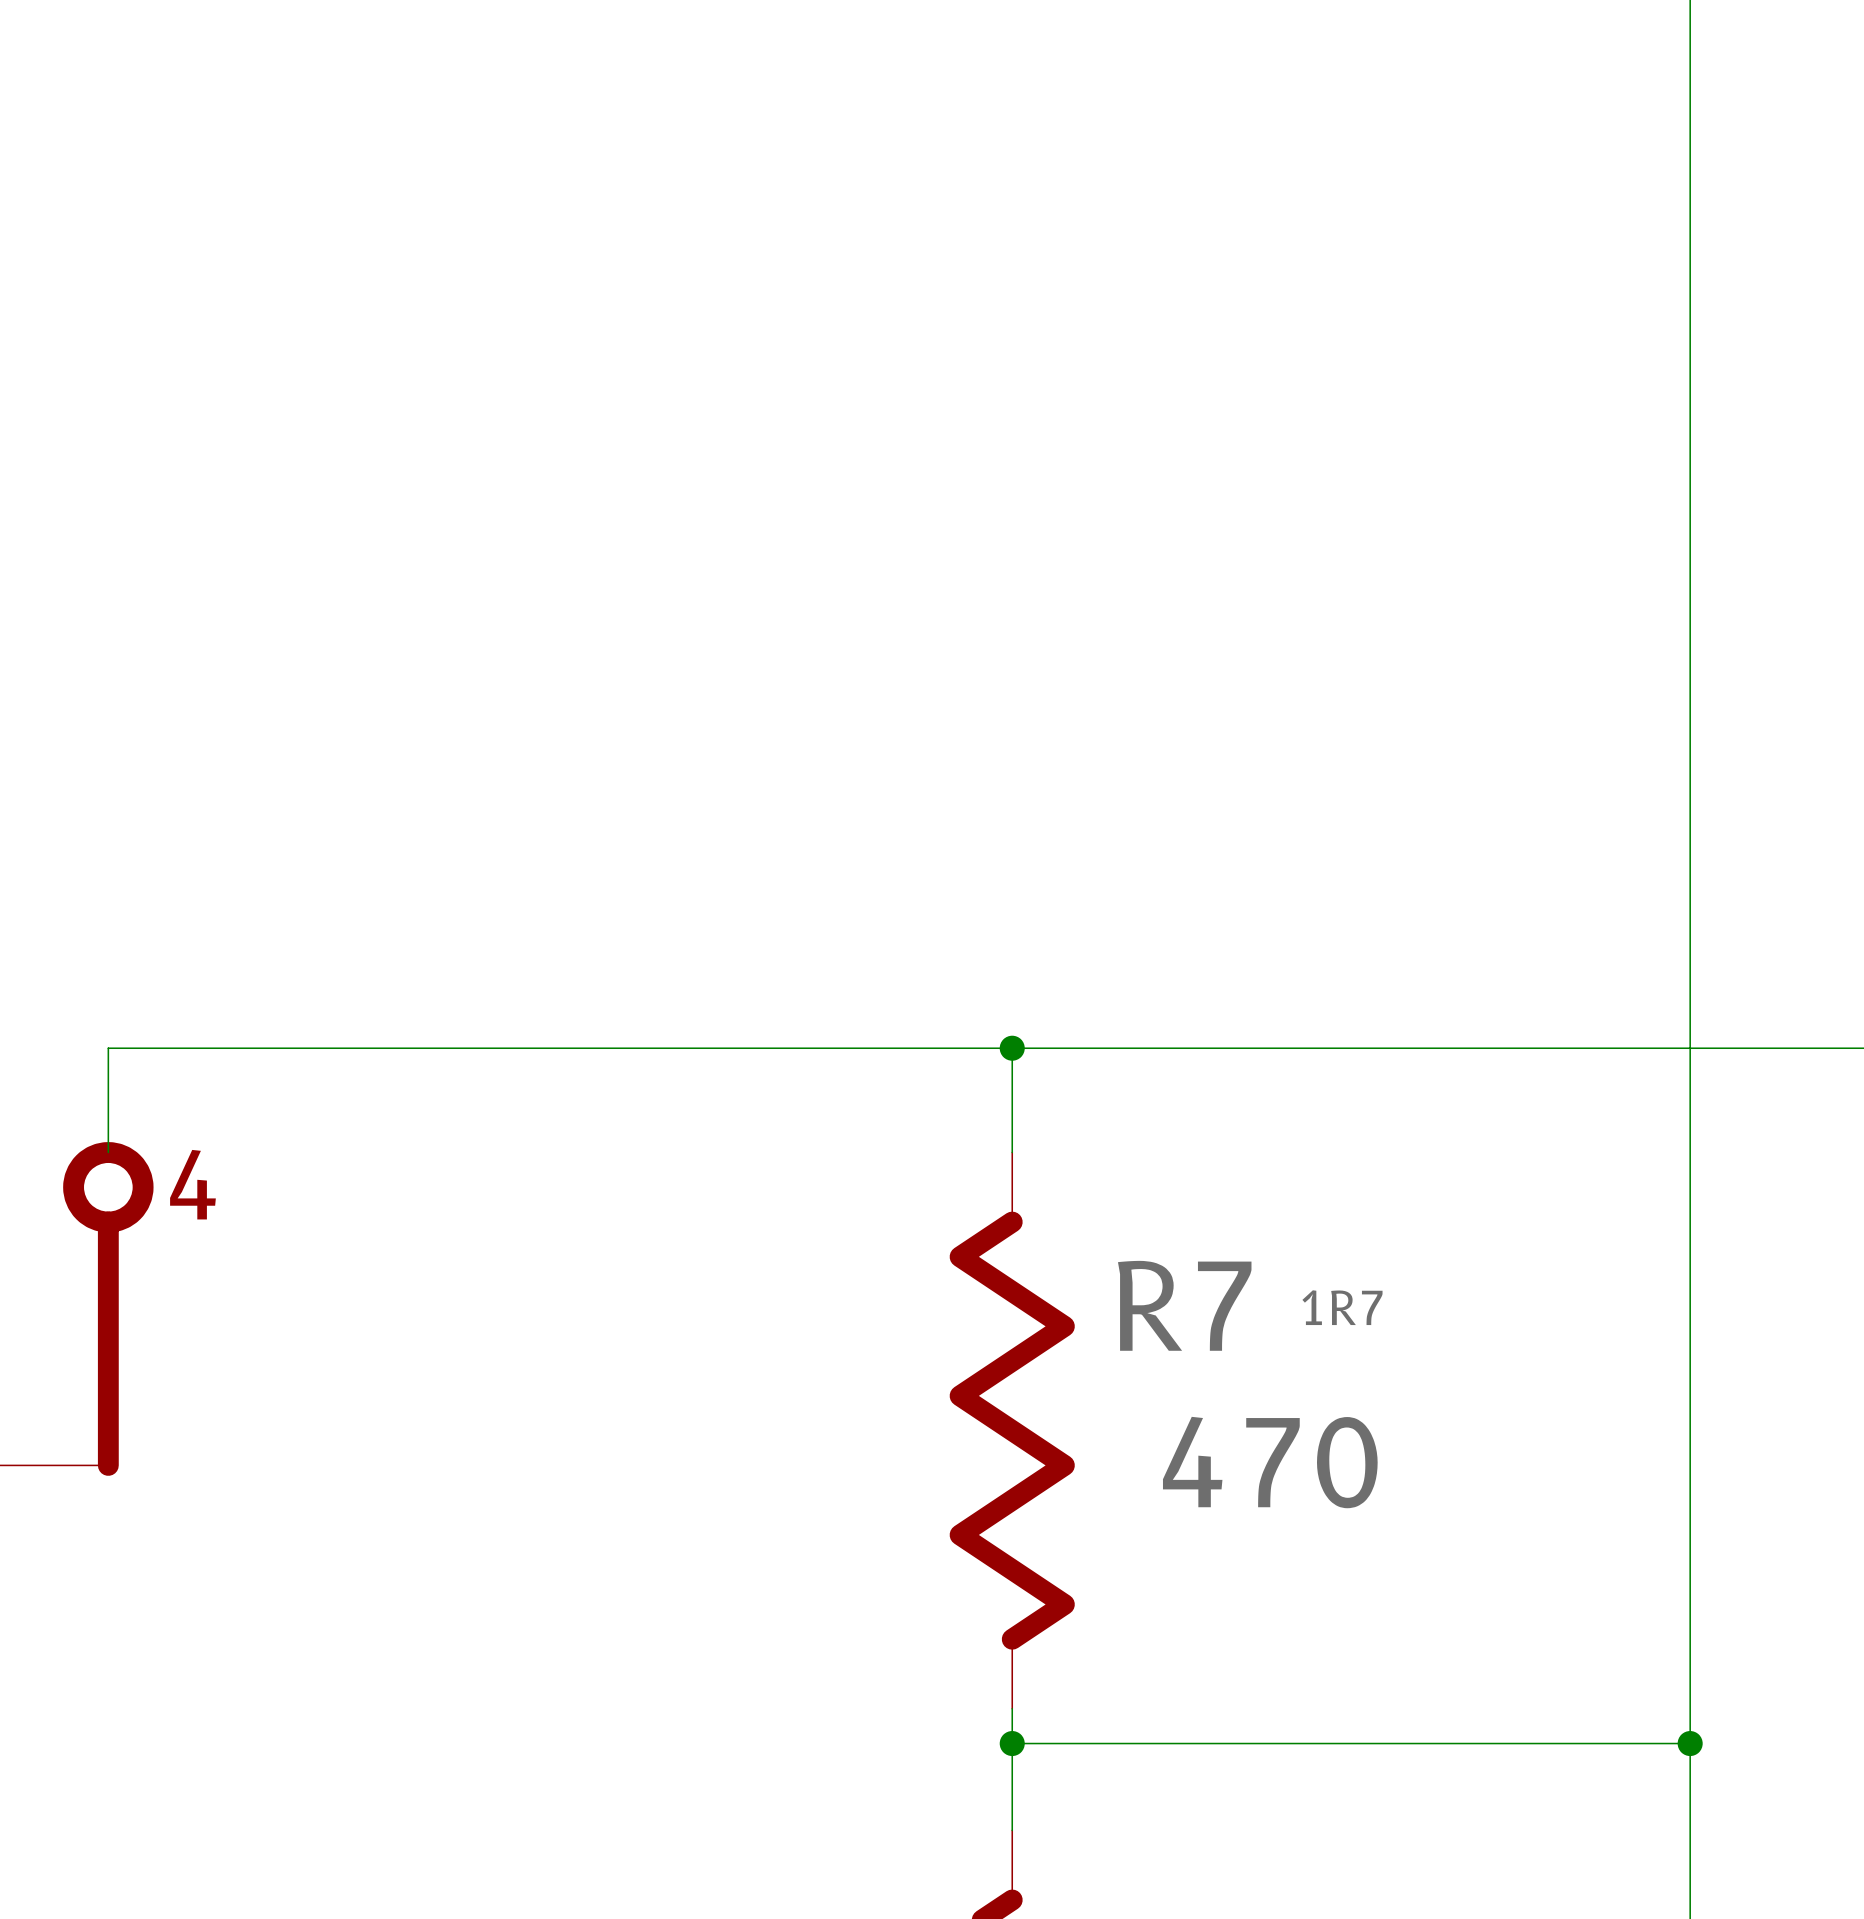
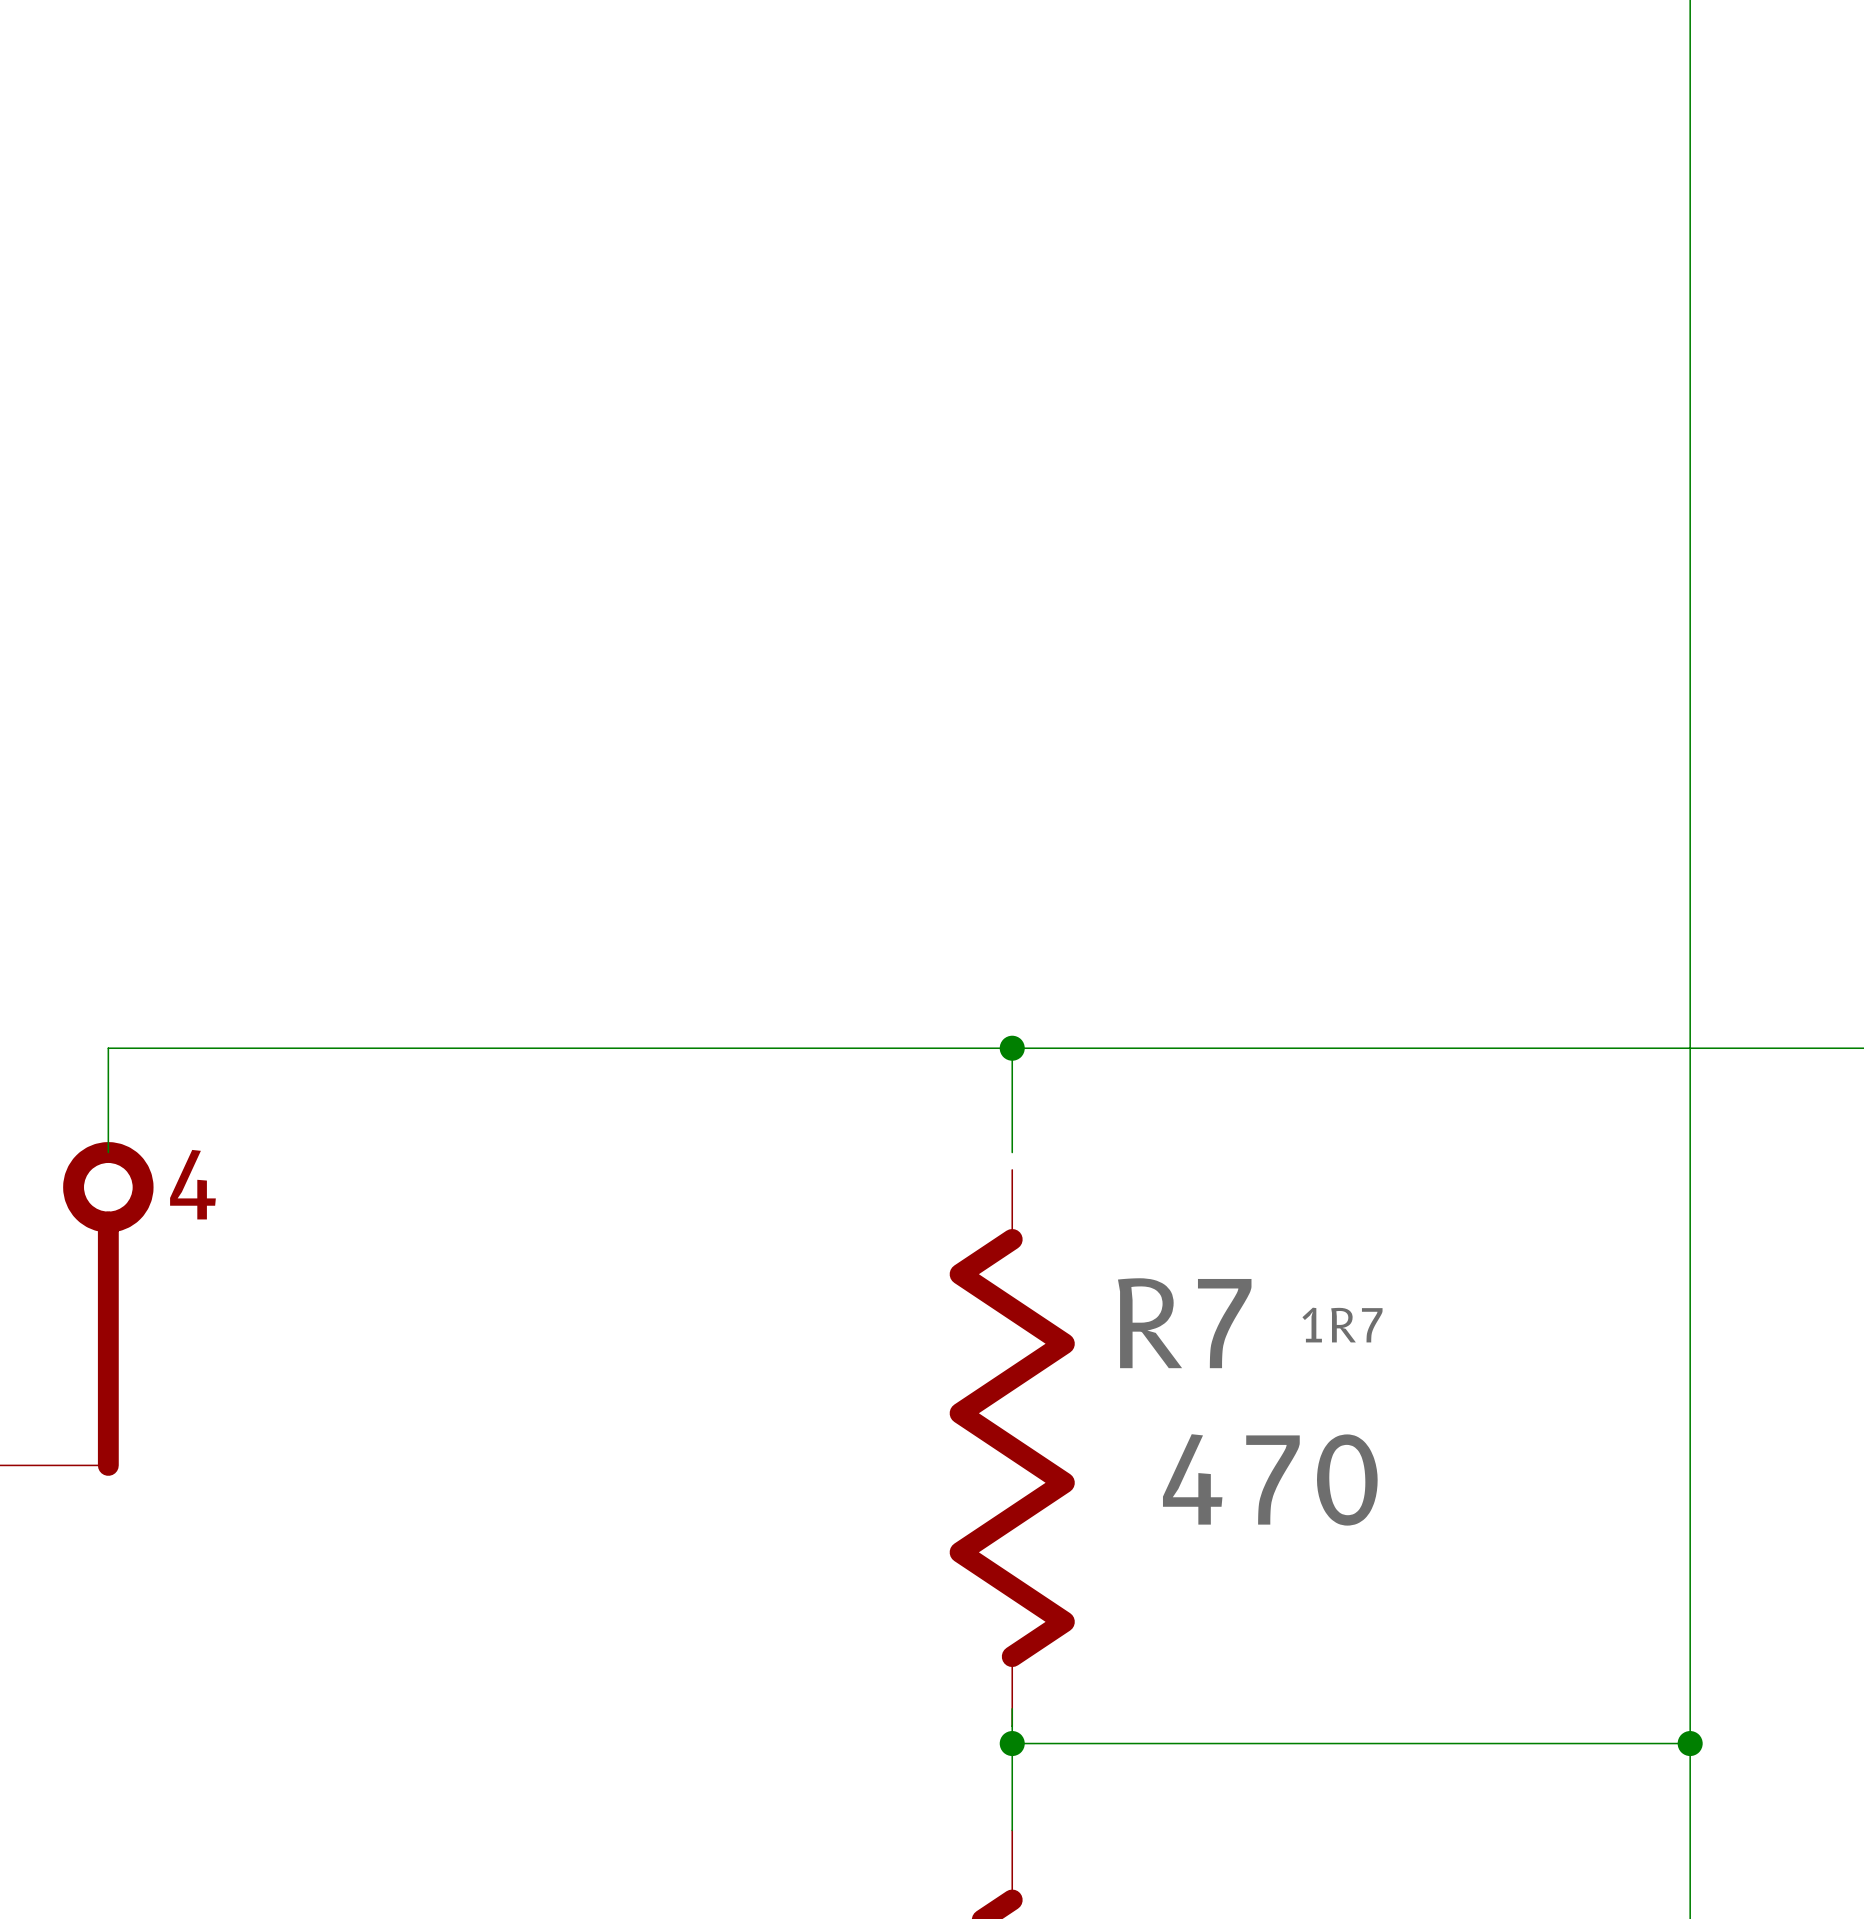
1R7 position: (1012, 1430) -> (1012, 1448)

